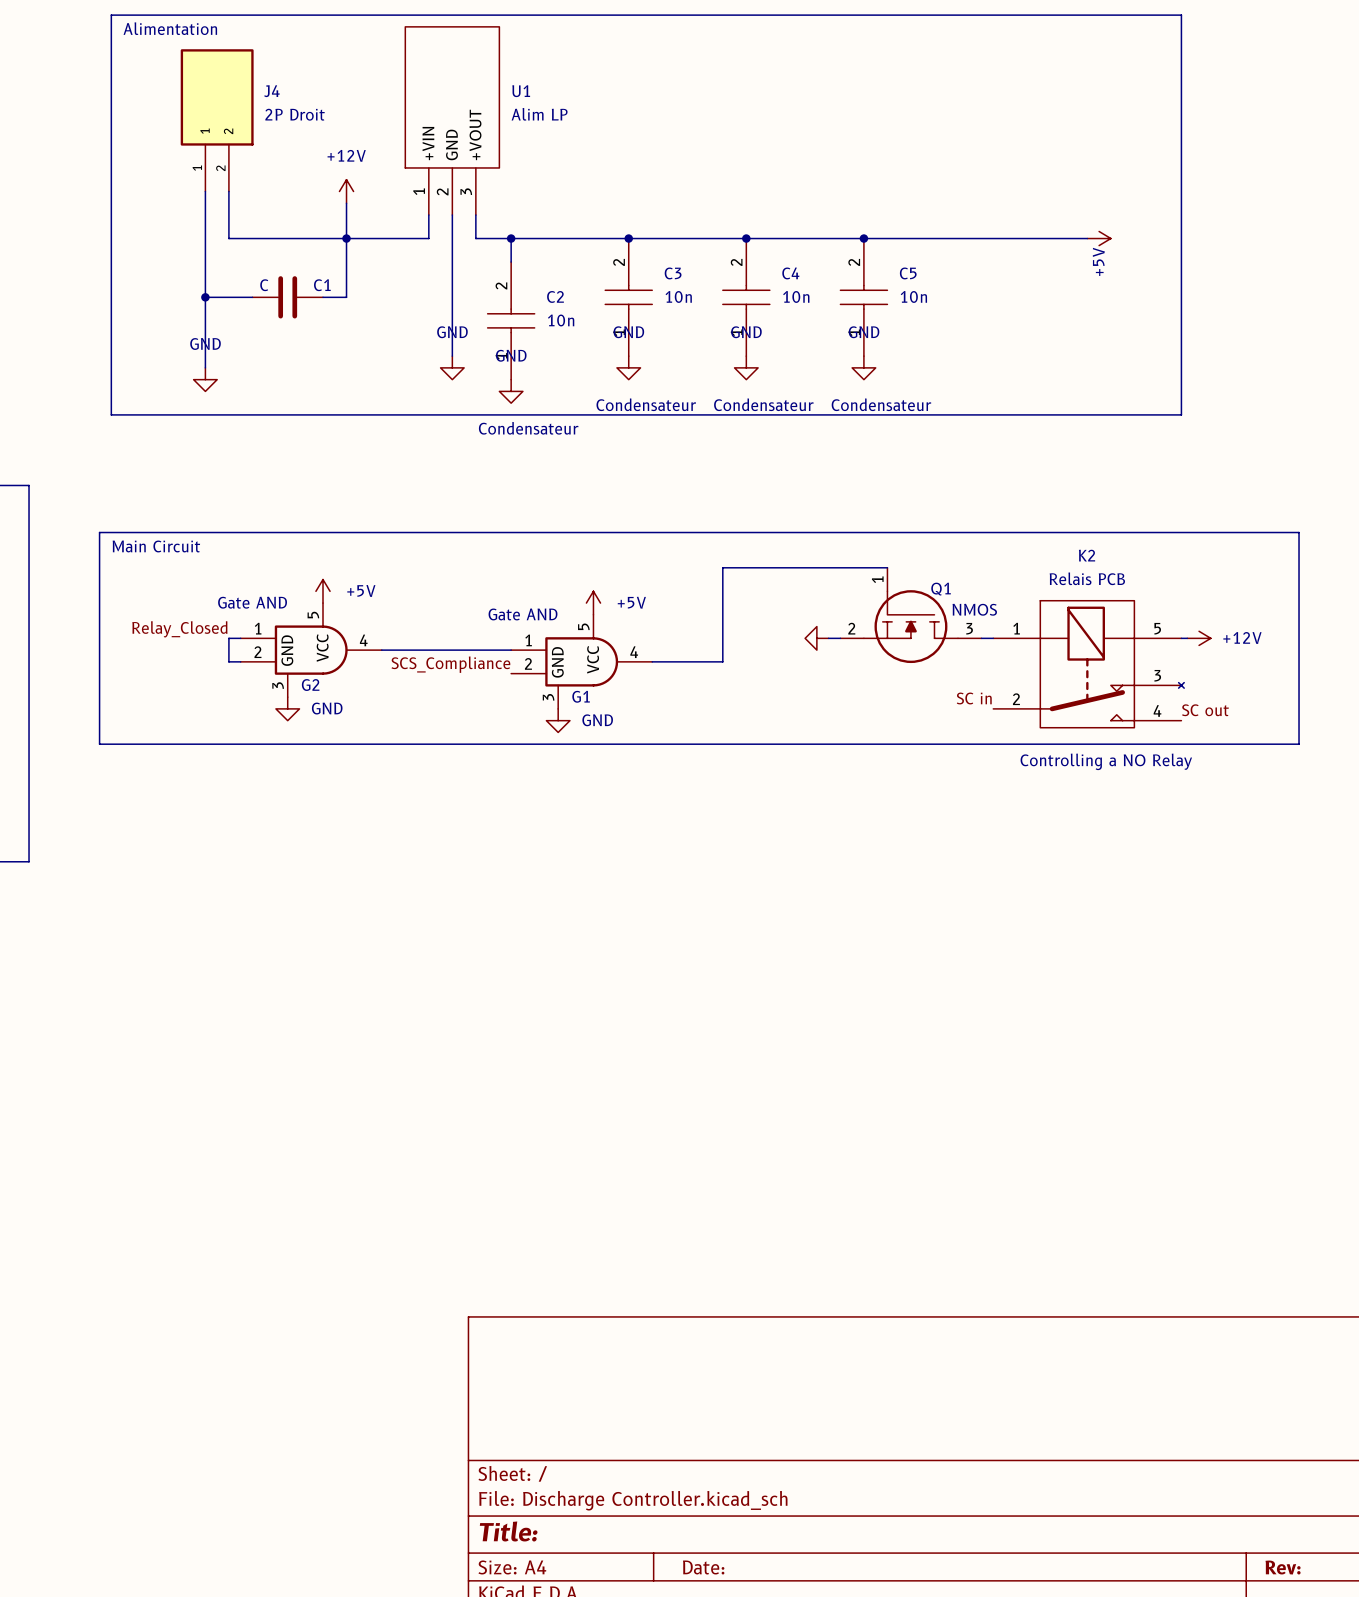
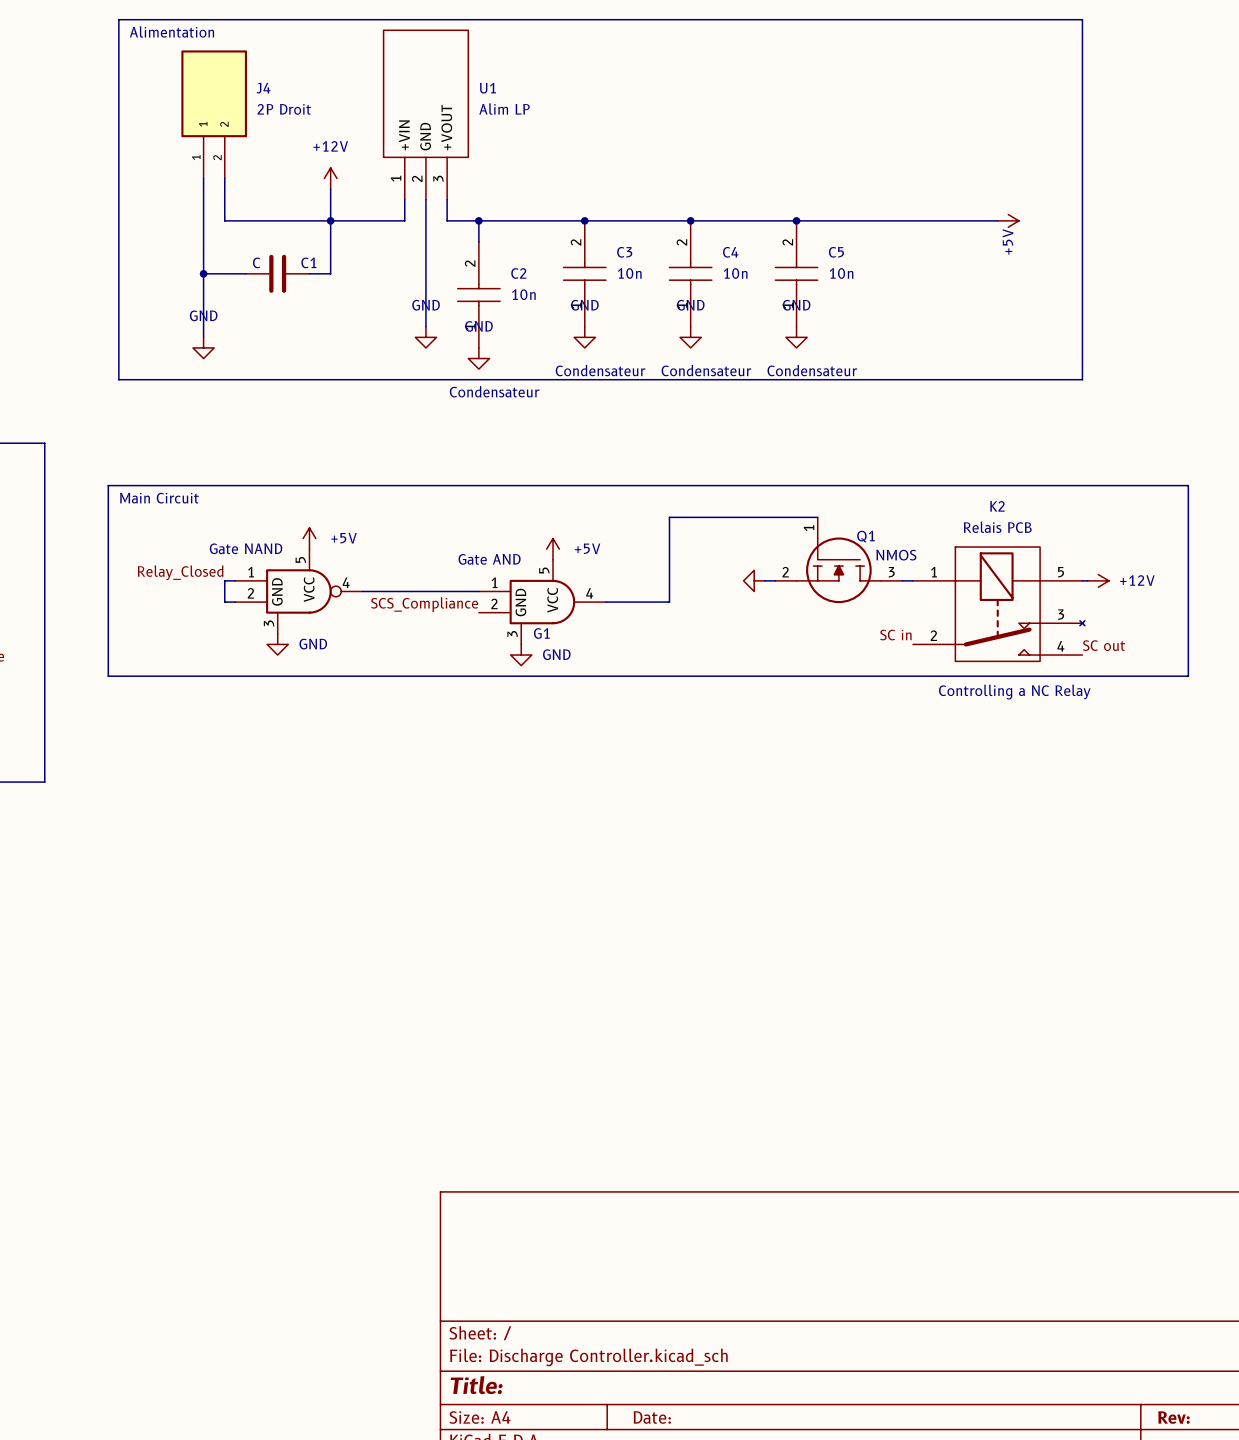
G2: (311, 650) -> none
part: none -> (298, 591)
text: Controlling a NO Relay (1106, 761) -> Controlling a NC Relay (1014, 692)

